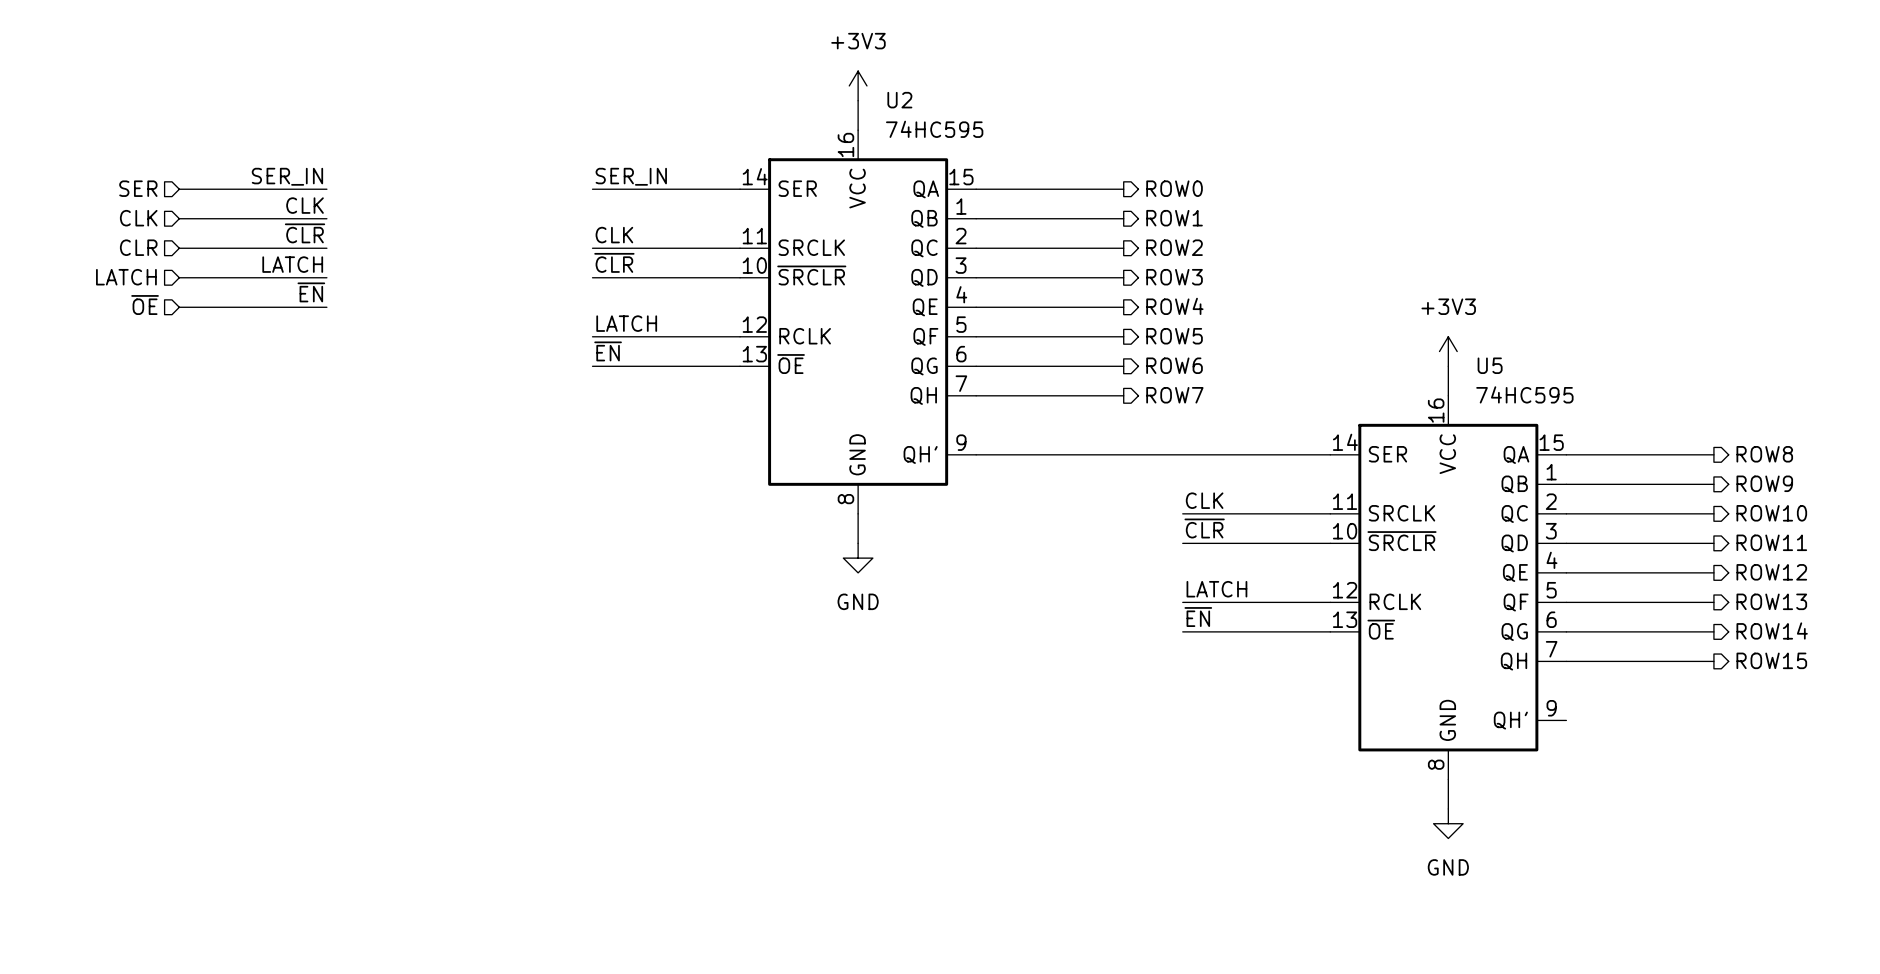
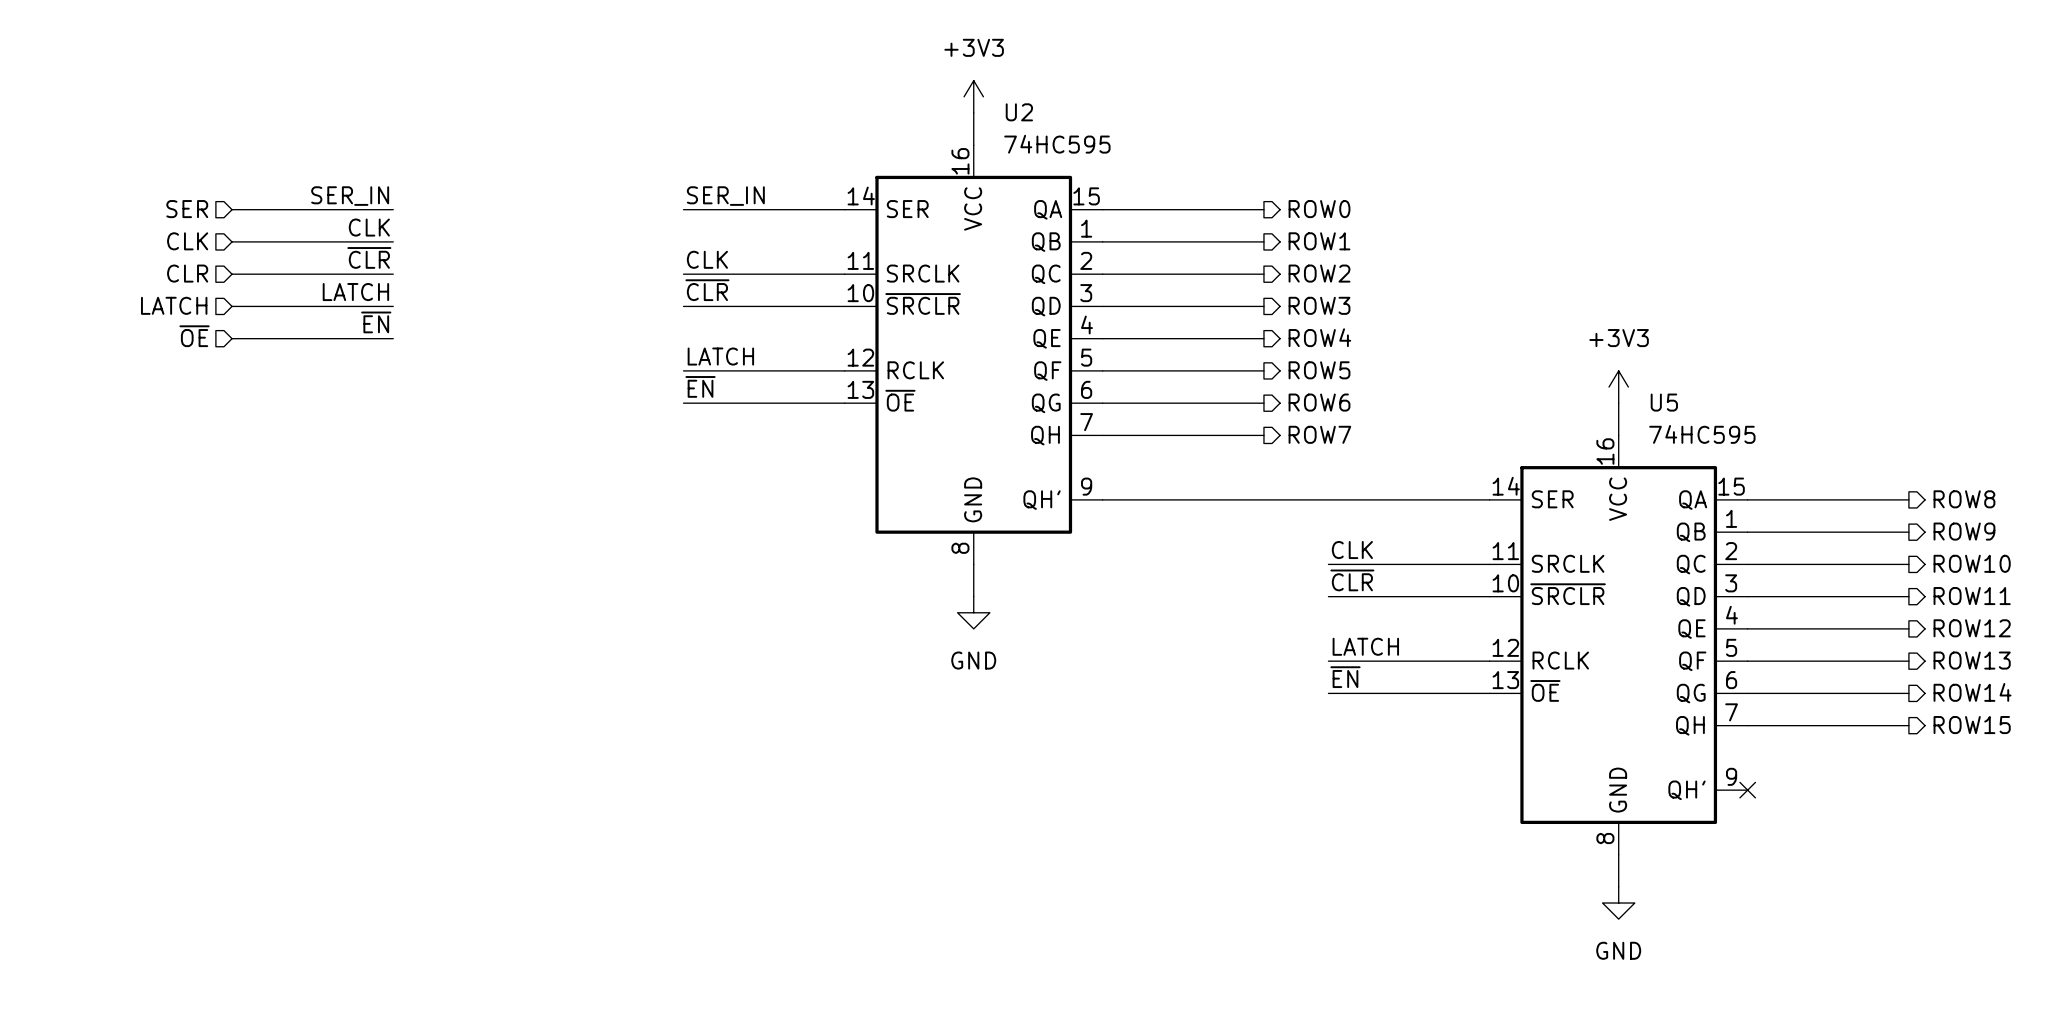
no-connect mark: none -> (1747, 790)

